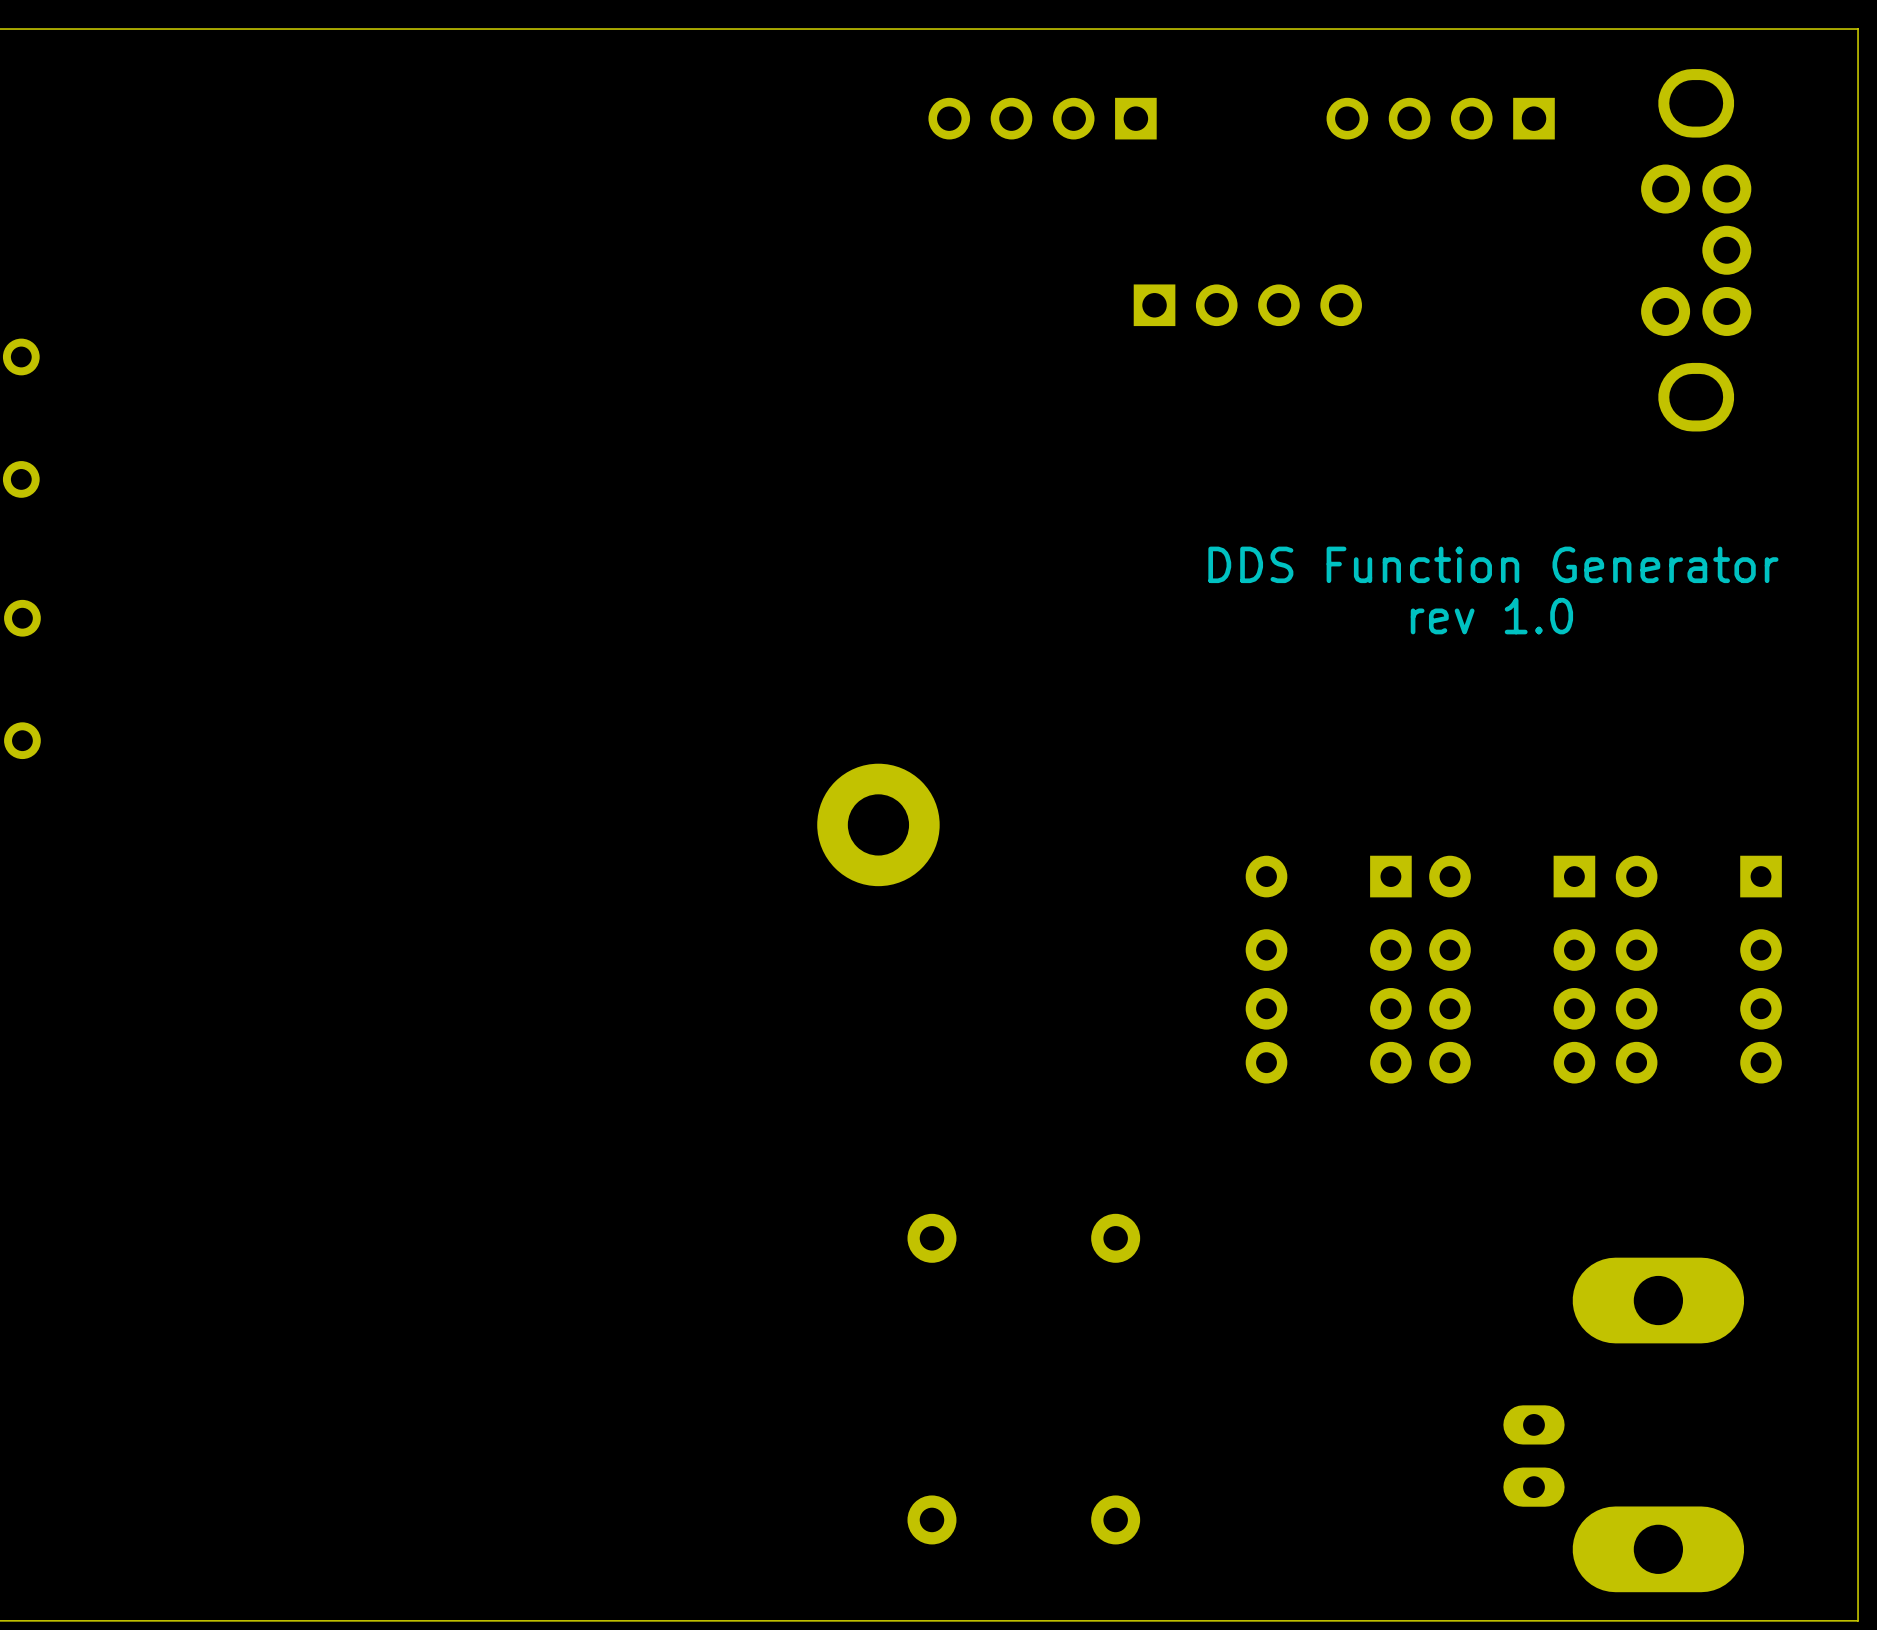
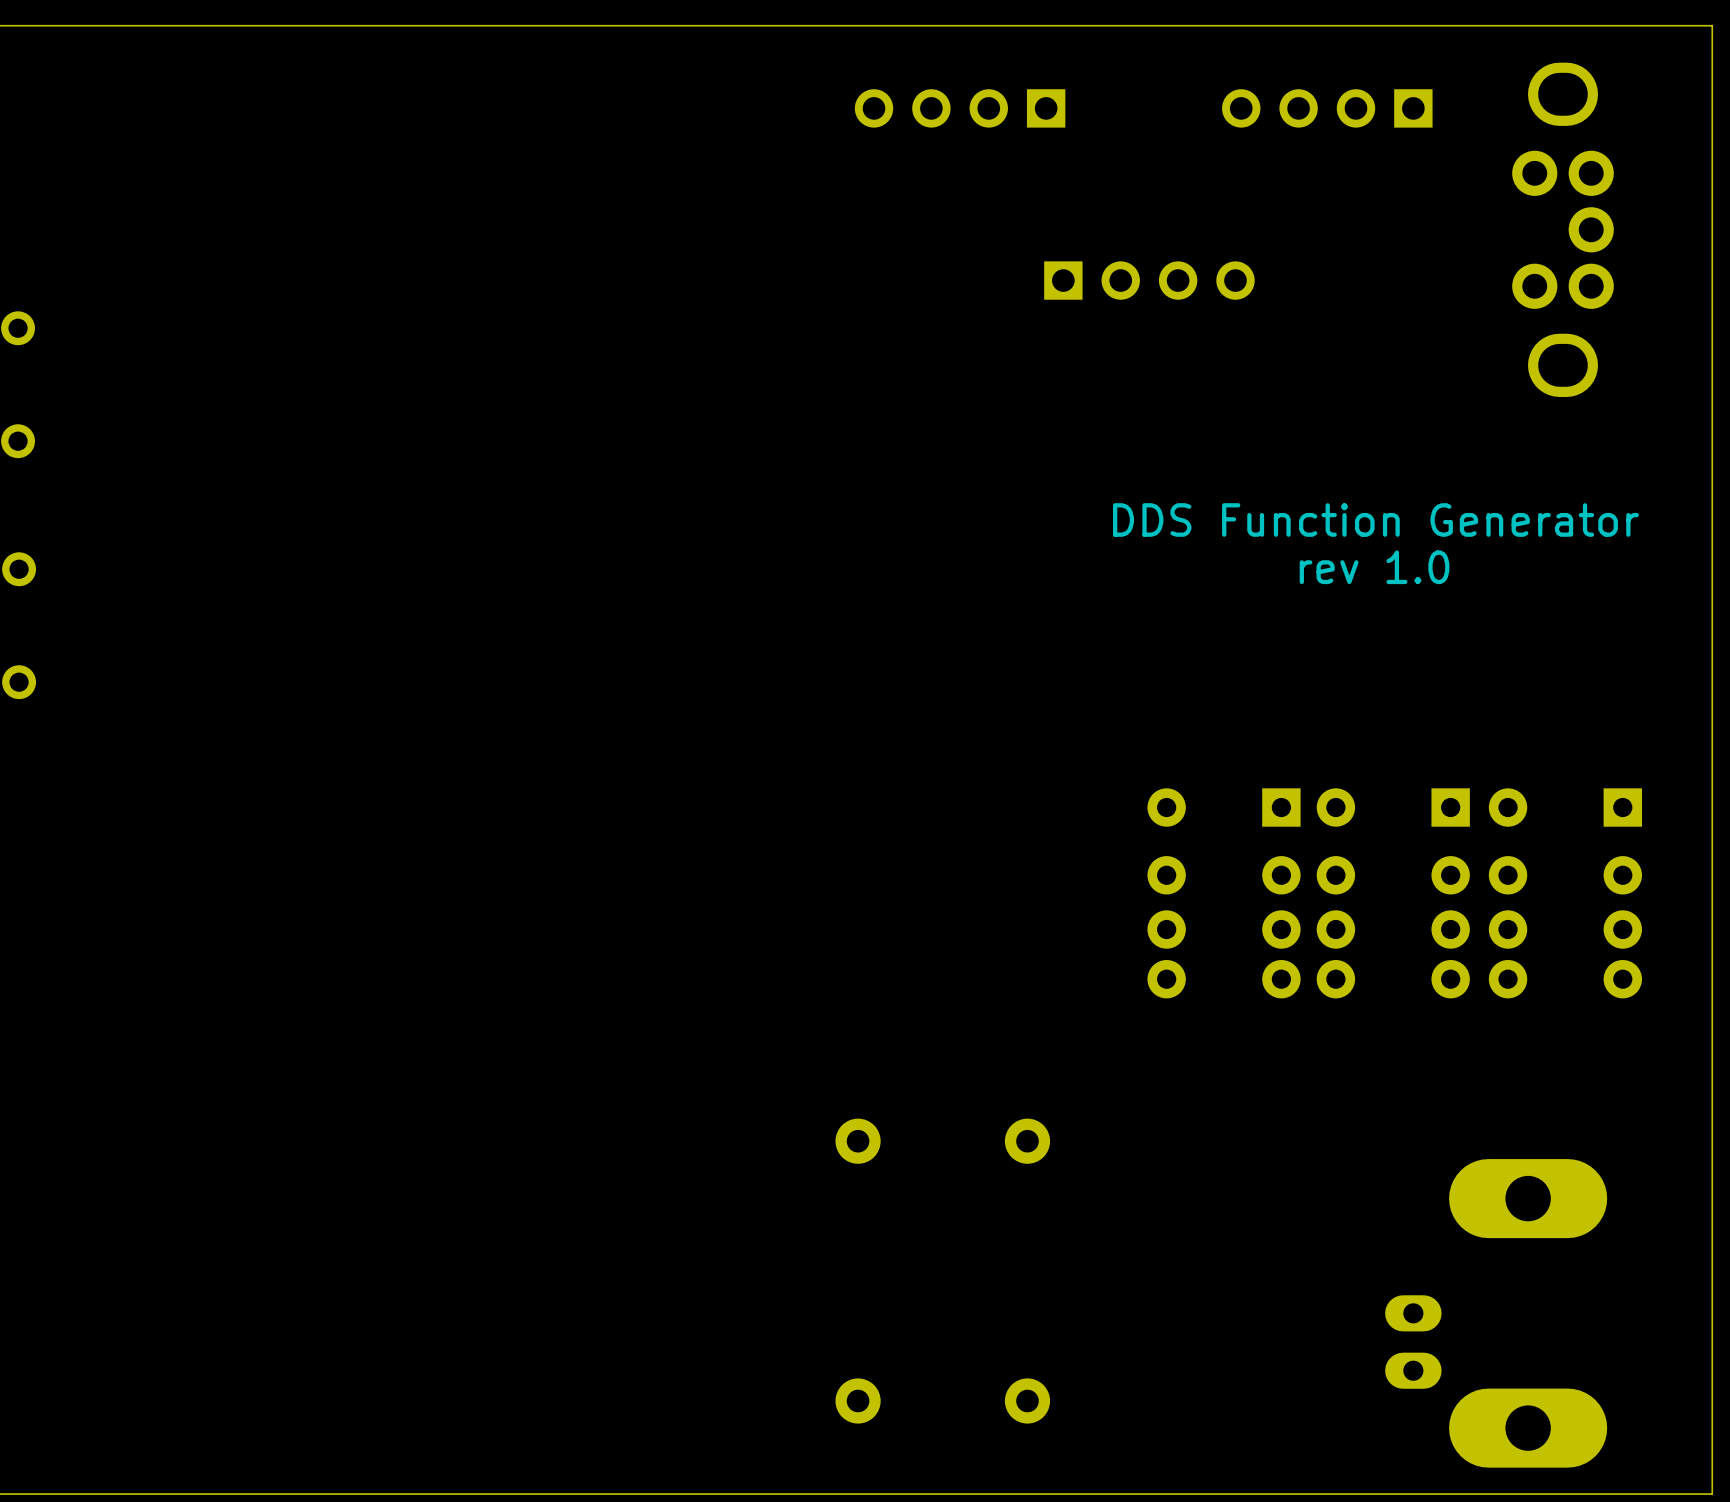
part: (878, 824) -> none

